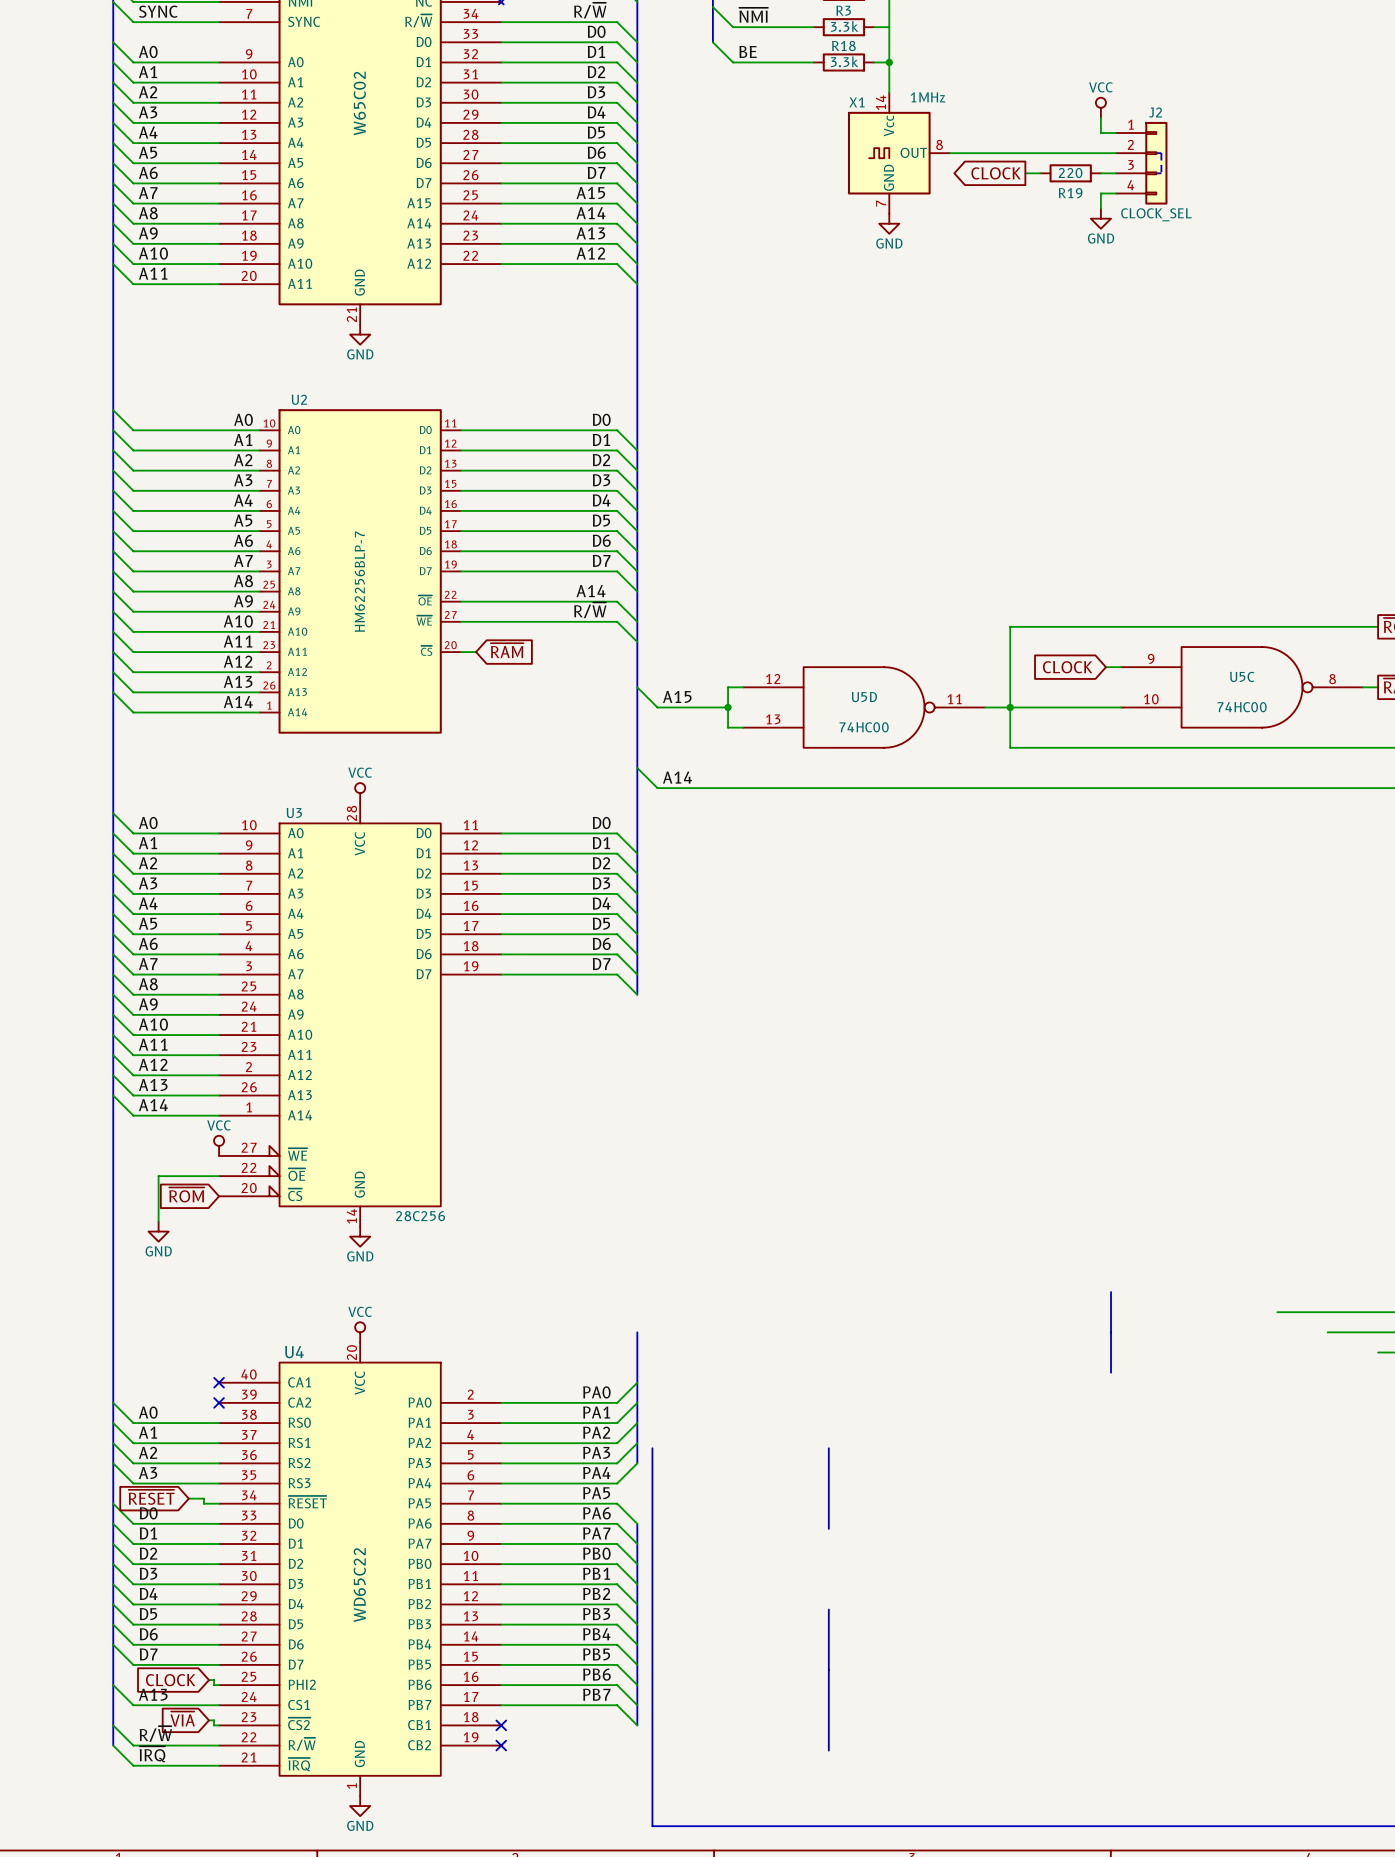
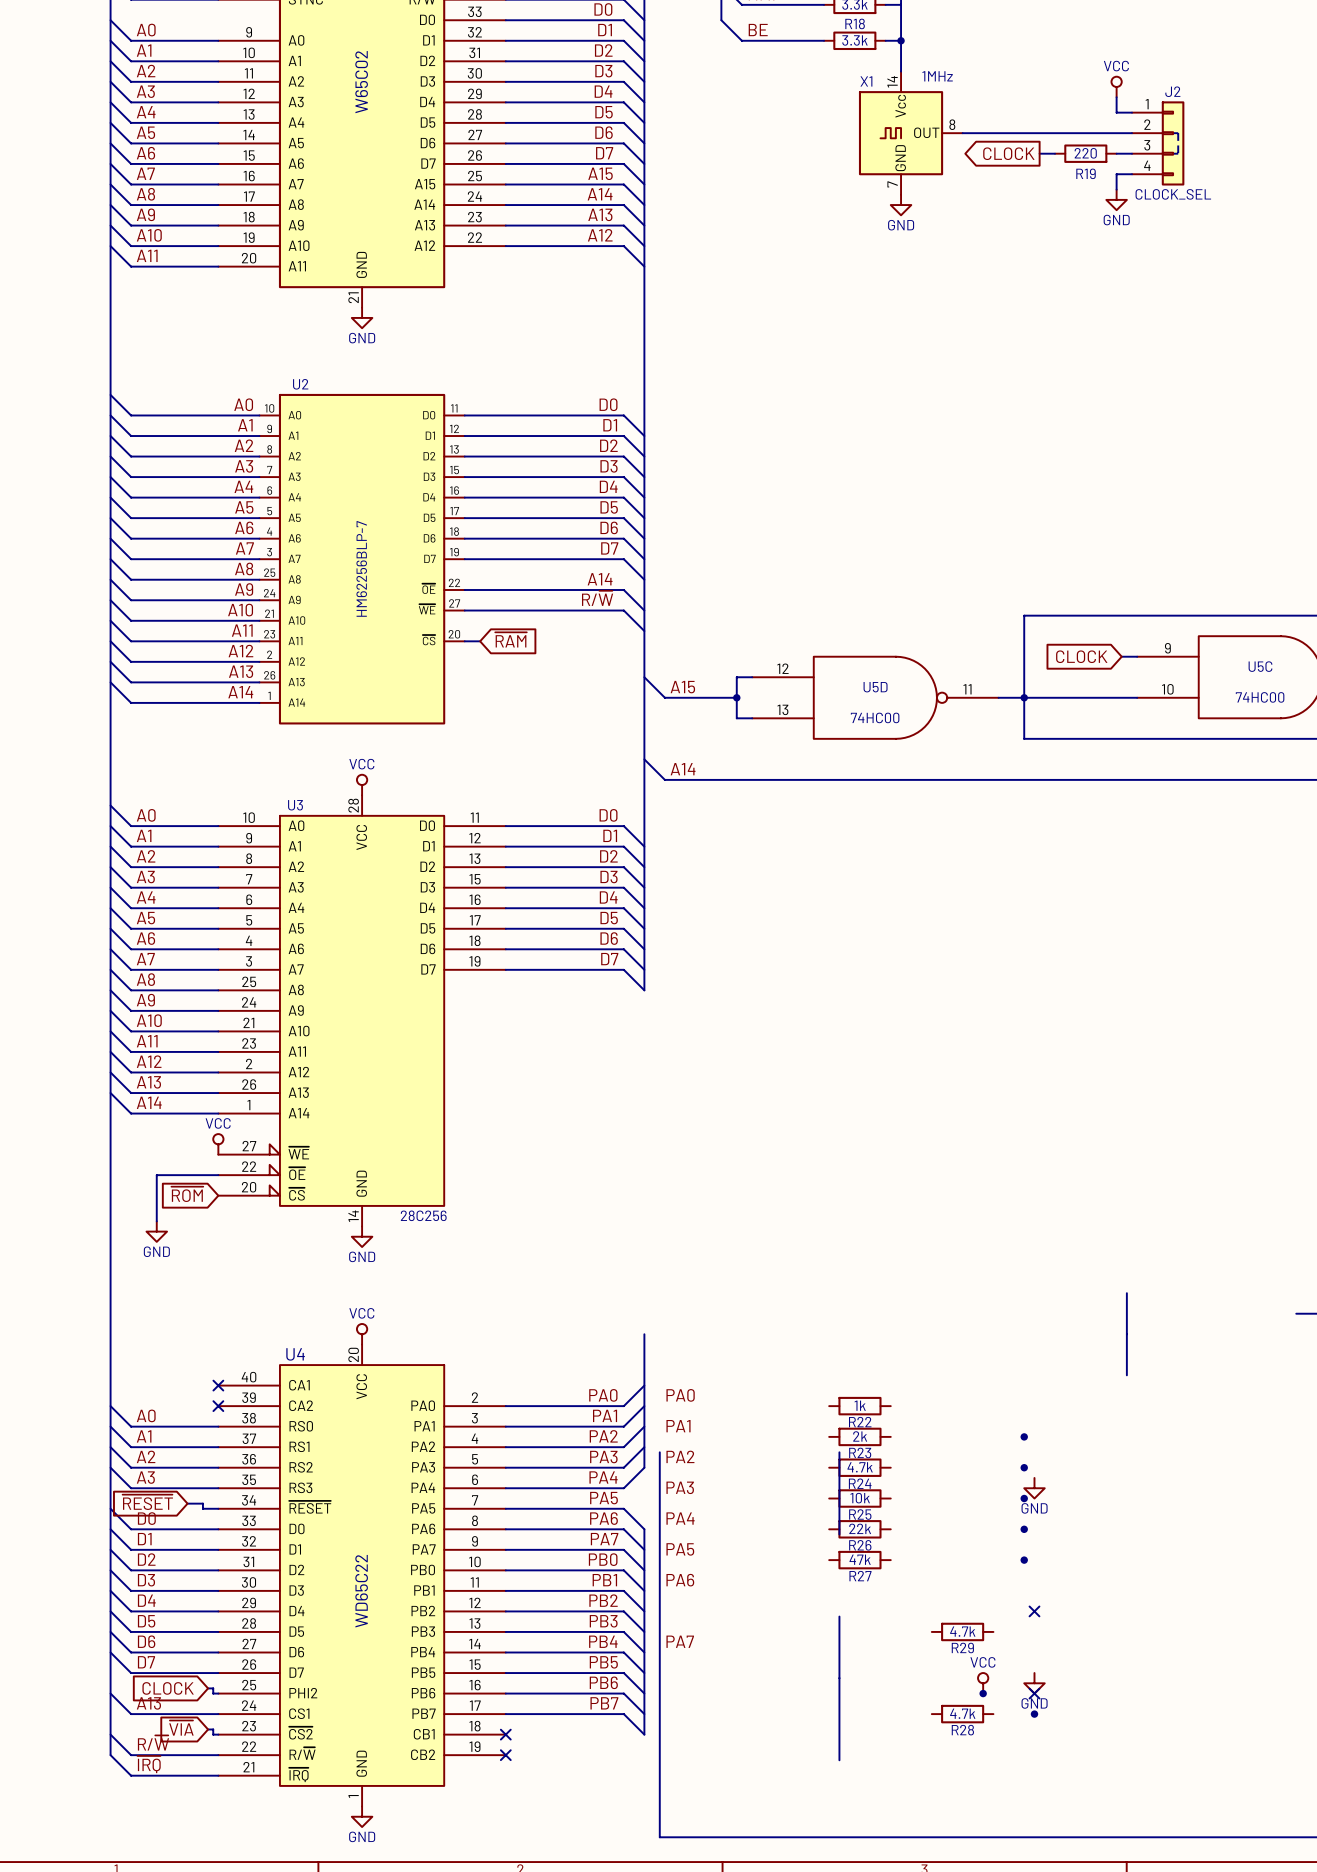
label: none -> PA0 (680, 1395)
R22: none -> 1k (859, 1406)
label: none -> PA1 (678, 1426)
R23: none -> 2k (859, 1436)
junction: none -> (1024, 1436)
label: none -> PA2 (680, 1456)
R24: none -> 4.7k (859, 1467)
junction: none -> (1024, 1467)
label: none -> PA3 (680, 1487)
power symbol: none -> GND (1034, 1488)
R25: none -> 10k (859, 1498)
junction: none -> (1024, 1498)
label: none -> PA4 (680, 1518)
R26: none -> 22k (859, 1529)
junction: none -> (1024, 1529)
label: none -> PA5 (680, 1549)
R27: none -> 47k (859, 1560)
junction: none -> (1024, 1560)
label: none -> PA6 (680, 1580)
no-connect mark: none -> (1034, 1611)
R29: none -> 4.7k (962, 1631)
label: none -> PA7 (680, 1641)
power symbol: none -> VCC (983, 1683)
power symbol: none -> GND (1034, 1683)
junction: none -> (983, 1693)
no-connect mark: none -> (1034, 1693)
R28: none -> 4.7k (962, 1714)
junction: none -> (1034, 1714)

